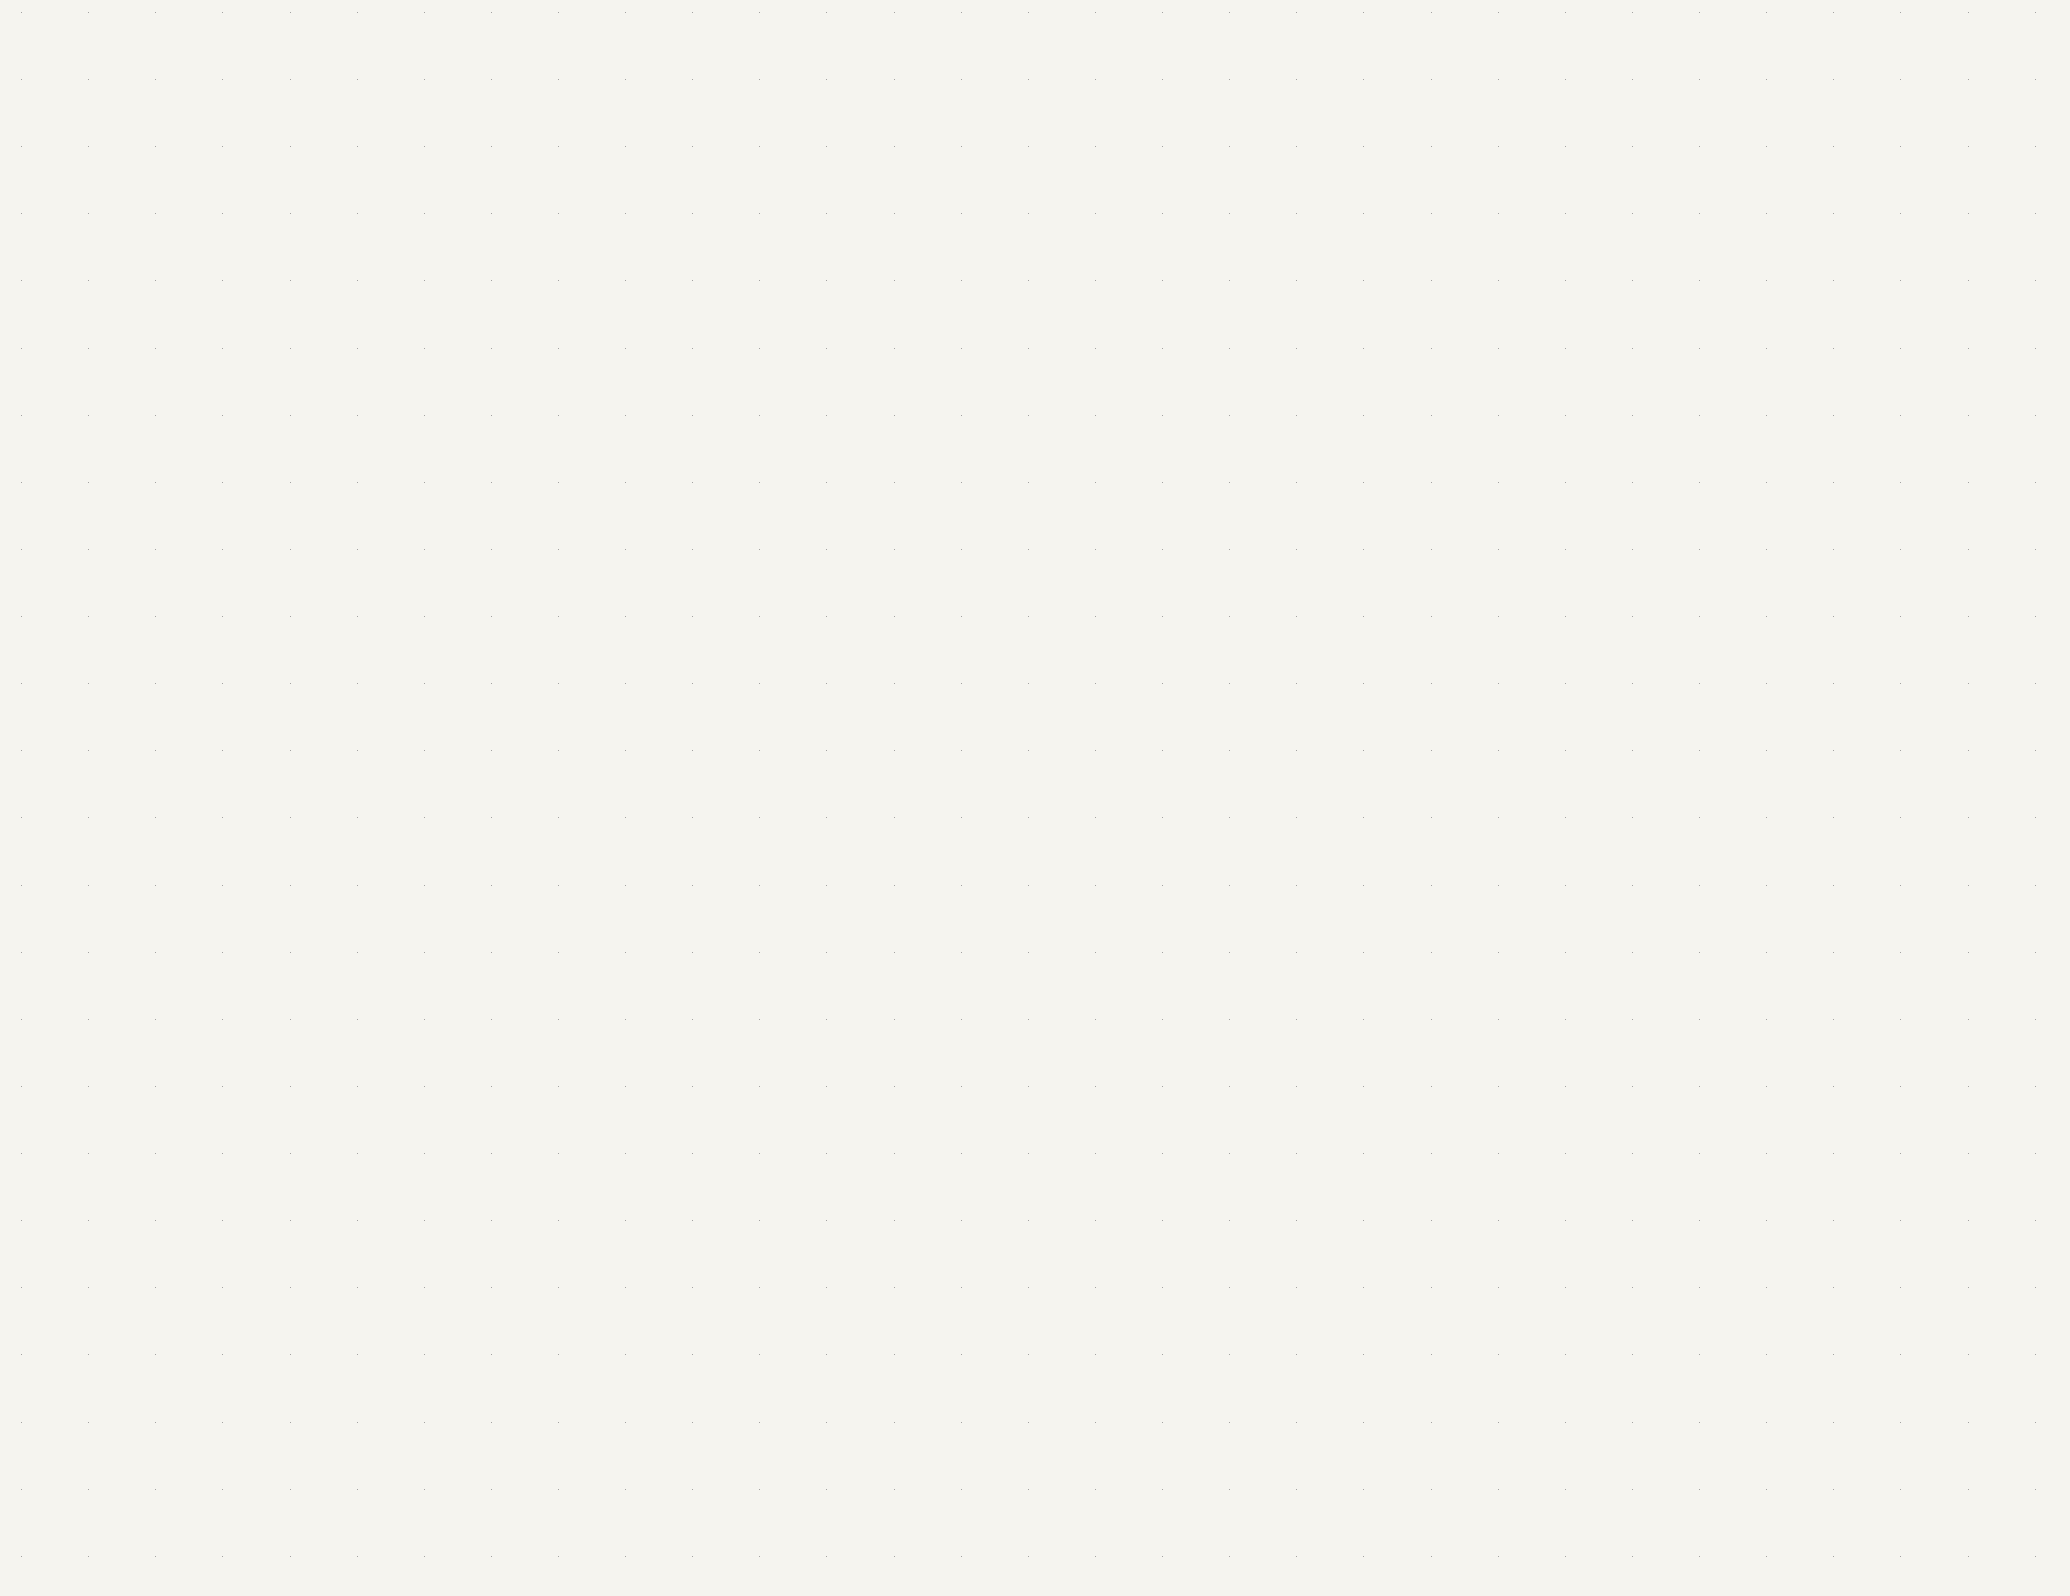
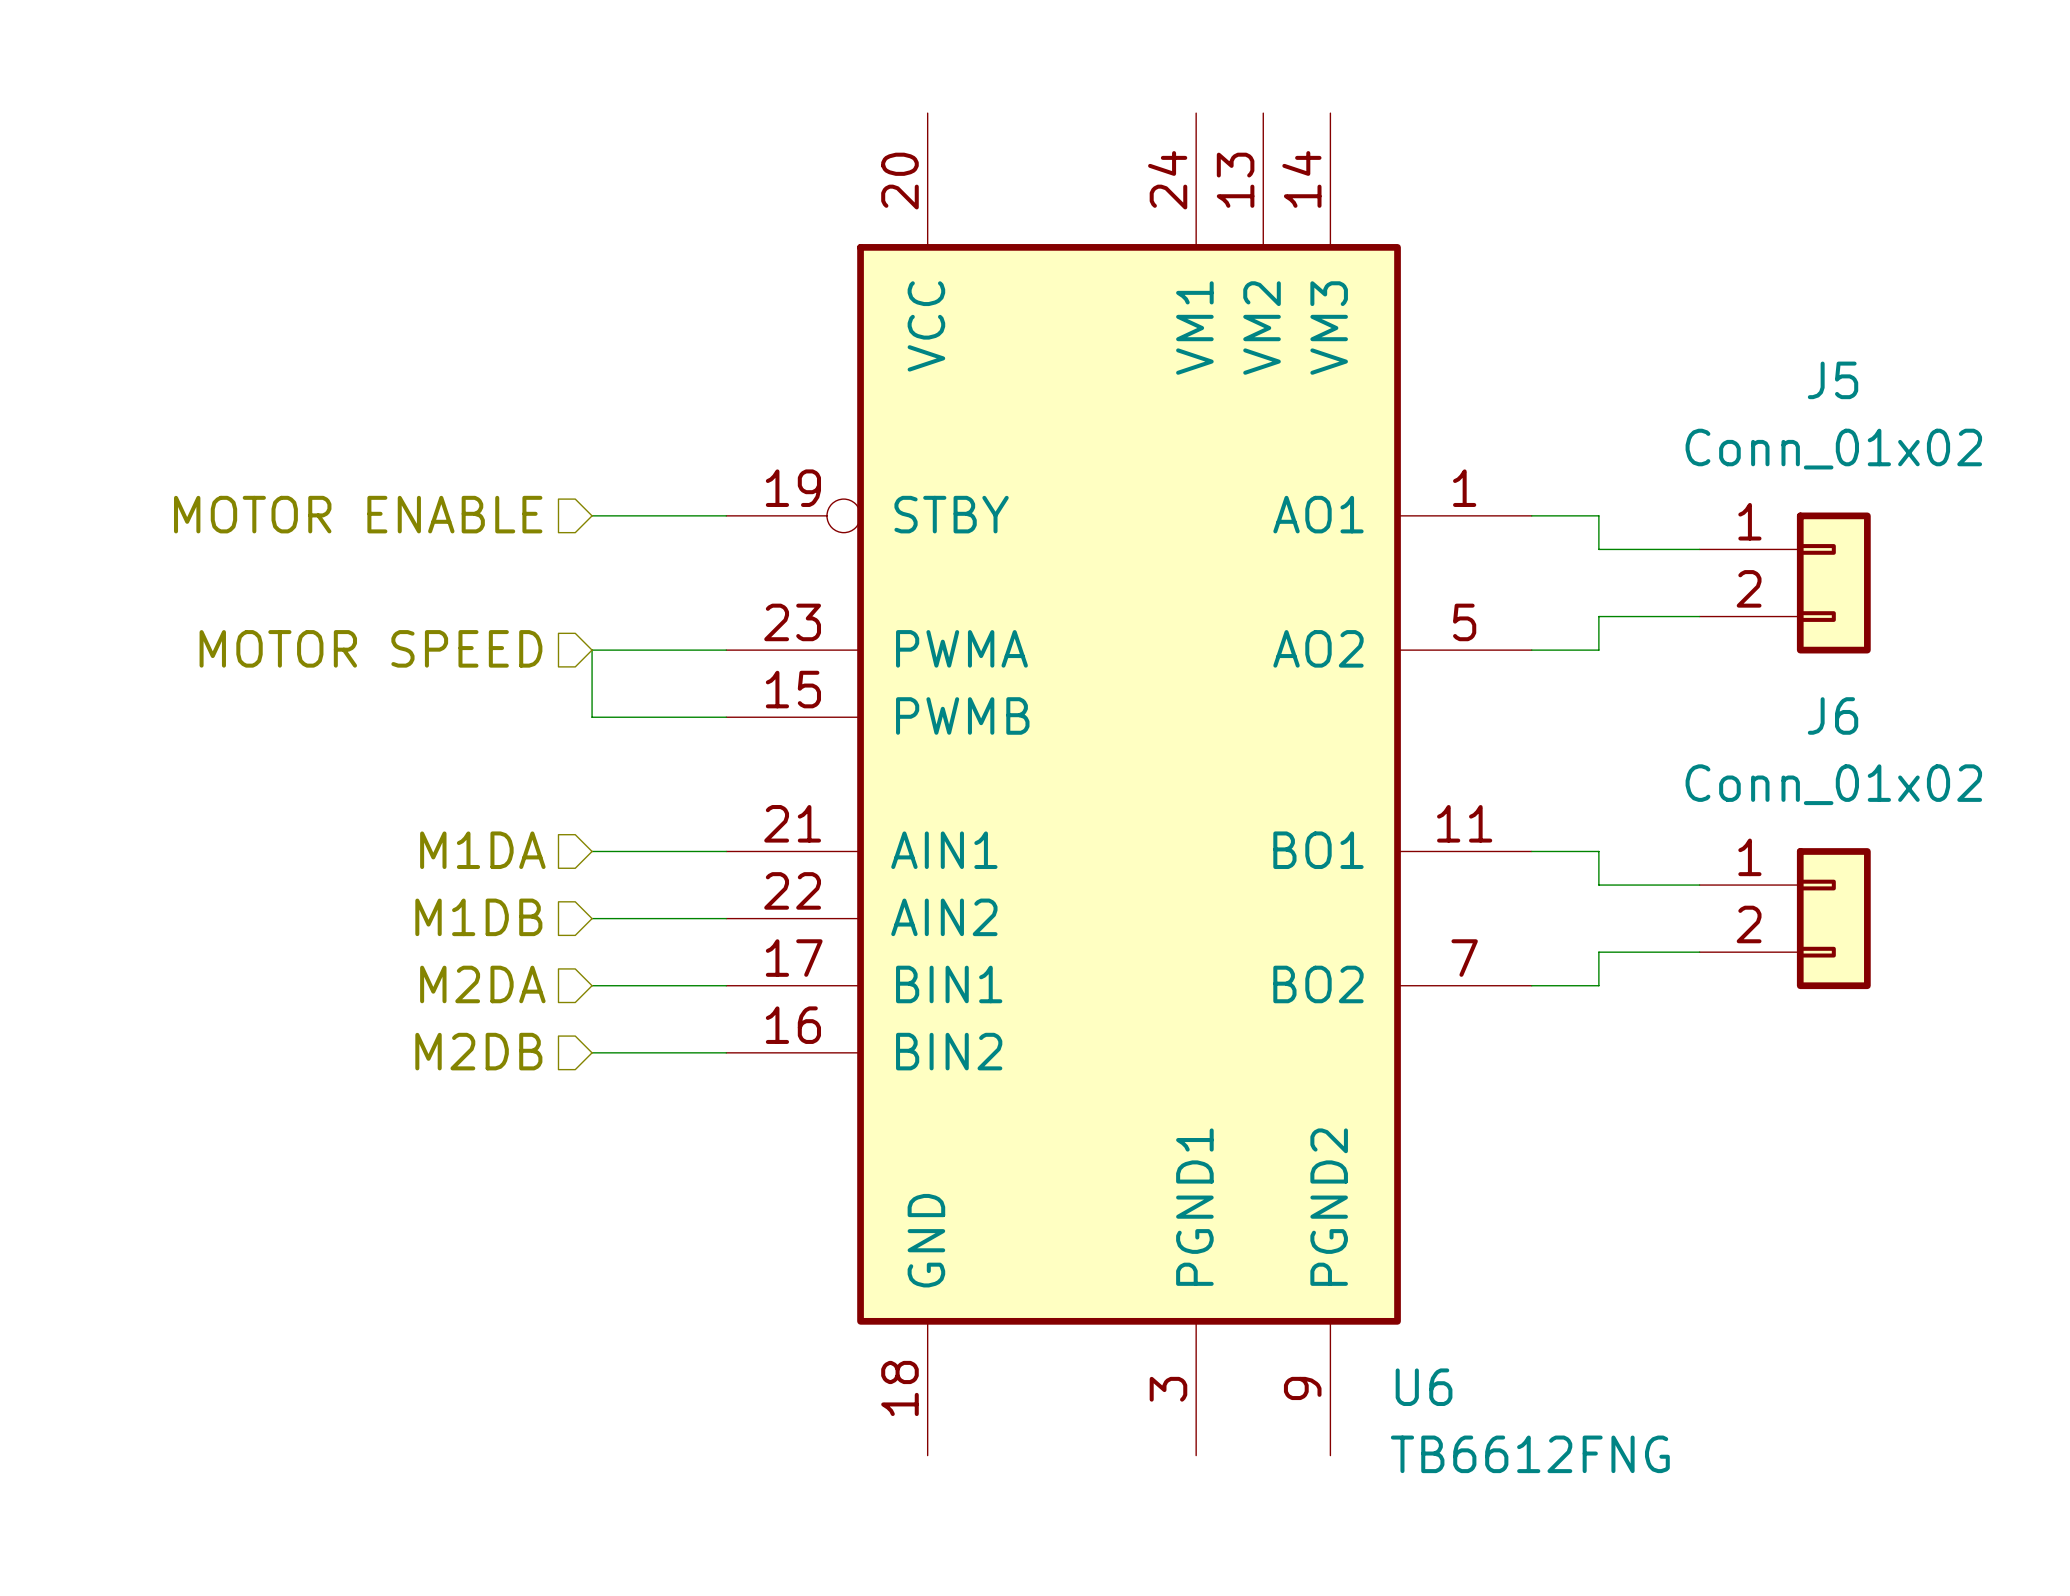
hierarchical label: none -> MOTOR ENABLE (358, 514)
wire: none -> (592, 515) (726, 515)
wire: none -> (1531, 515) (1598, 515) (1598, 549) (1699, 549)
J5: none -> Conn_01x02 (1785, 582)
wire: none -> (1699, 616) (1598, 616) (1598, 650) (1531, 650)
hierarchical label: none -> MOTOR SPEED (370, 648)
wire: none -> (726, 650) (592, 650) (592, 717) (726, 717)
U6: none -> TB6612FNG (1129, 784)
hierarchical label: none -> M1DA (482, 850)
wire: none -> (592, 851) (726, 851)
wire: none -> (1531, 851) (1598, 851) (1598, 885) (1699, 885)
hierarchical label: none -> M1DB (478, 917)
wire: none -> (592, 918) (726, 918)
J6: none -> Conn_01x02 (1785, 918)
wire: none -> (1699, 952) (1598, 952) (1598, 985) (1531, 985)
hierarchical label: none -> M2DA (482, 984)
wire: none -> (592, 985) (726, 985)
hierarchical label: none -> M2DB (478, 1051)
wire: none -> (592, 1052) (726, 1052)

